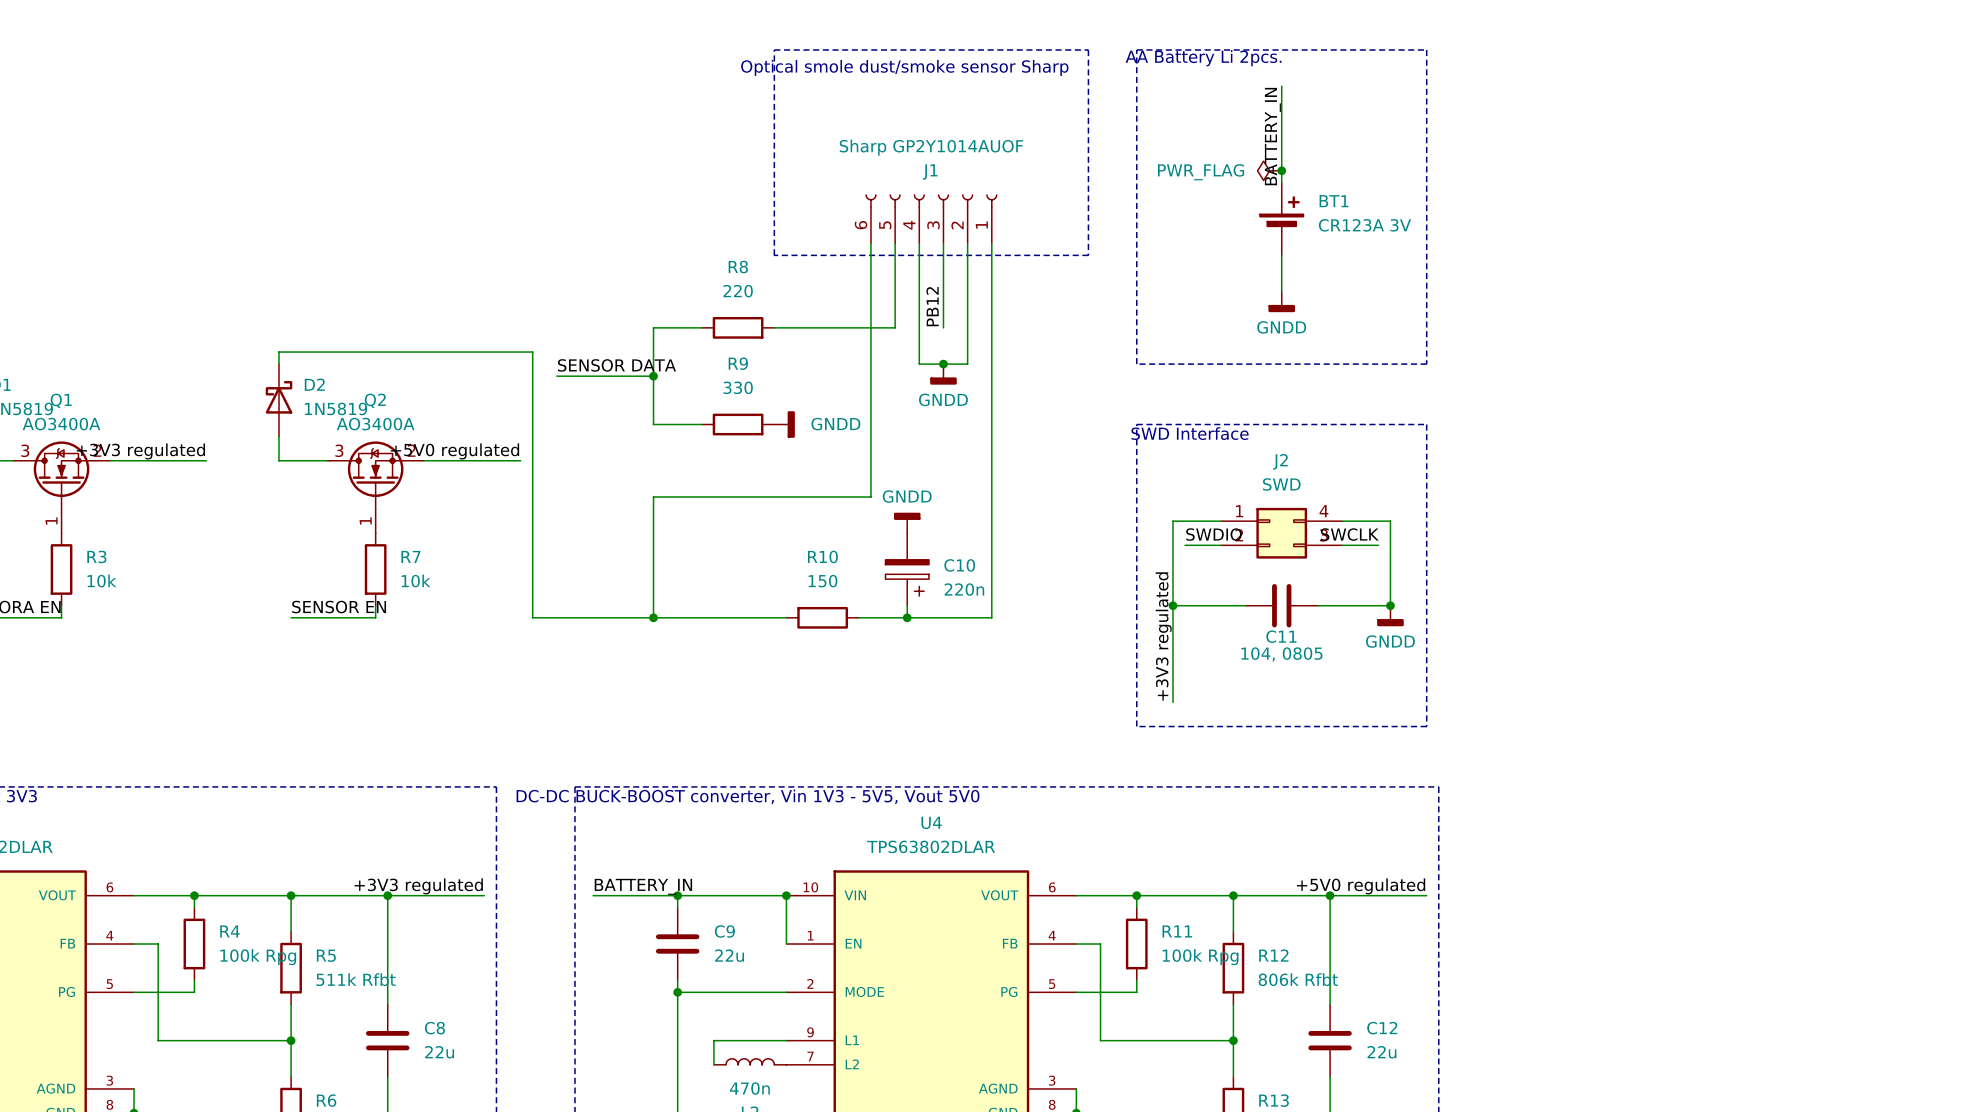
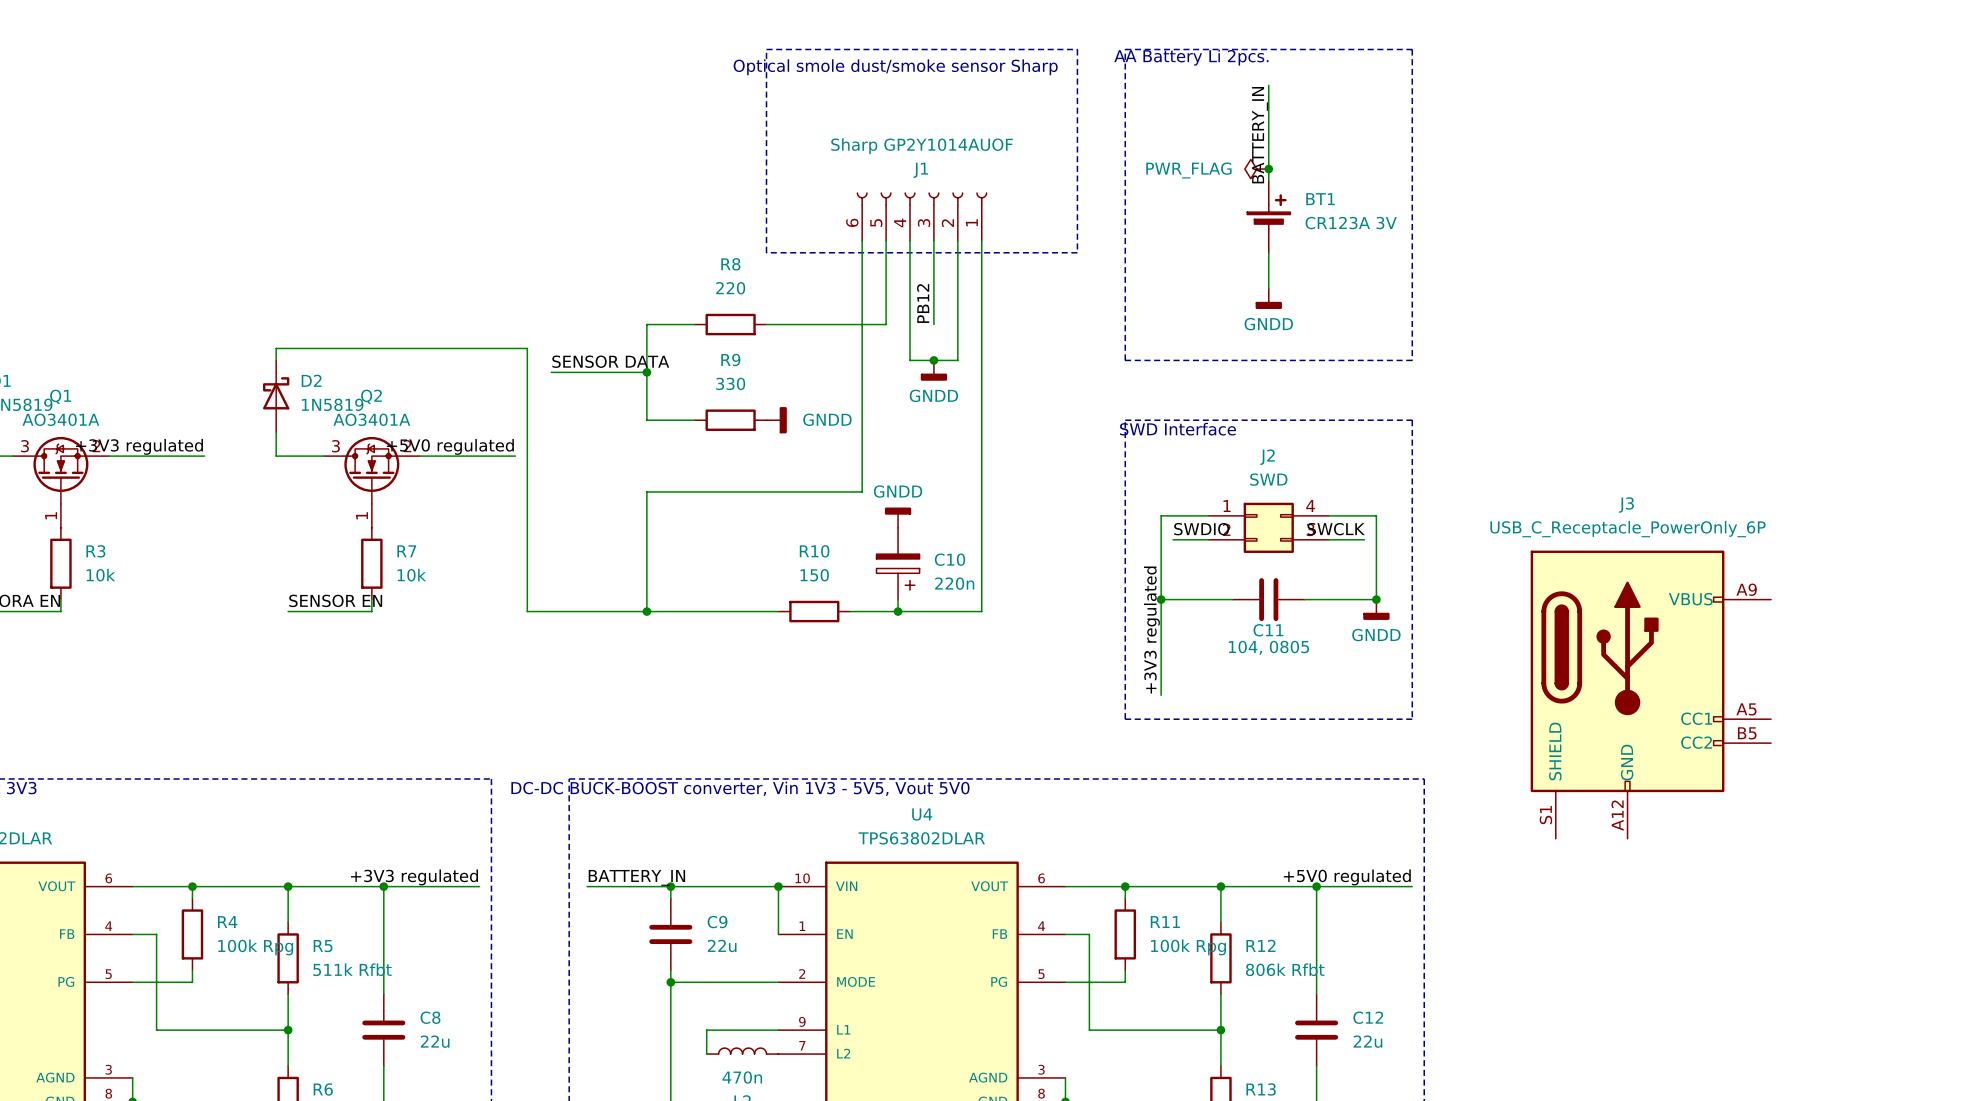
Q1 value: AO3400A (61, 424) -> AO3401A (60, 419)
Q2 value: AO3400A (375, 424) -> AO3401A (371, 419)
J3: none -> USB_C_Receptacle_PowerOnly_6P (1650, 694)

